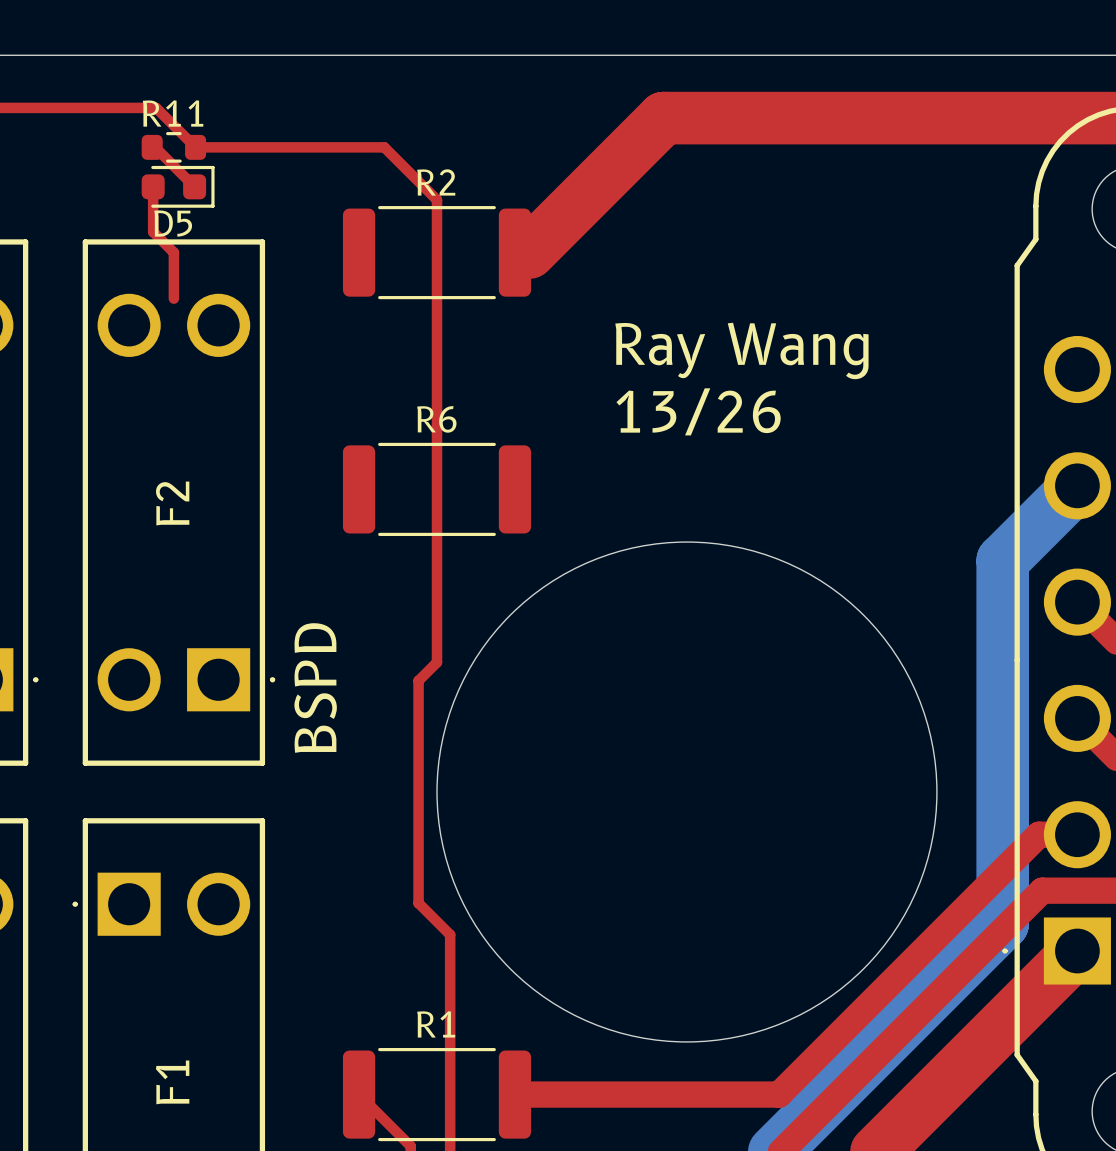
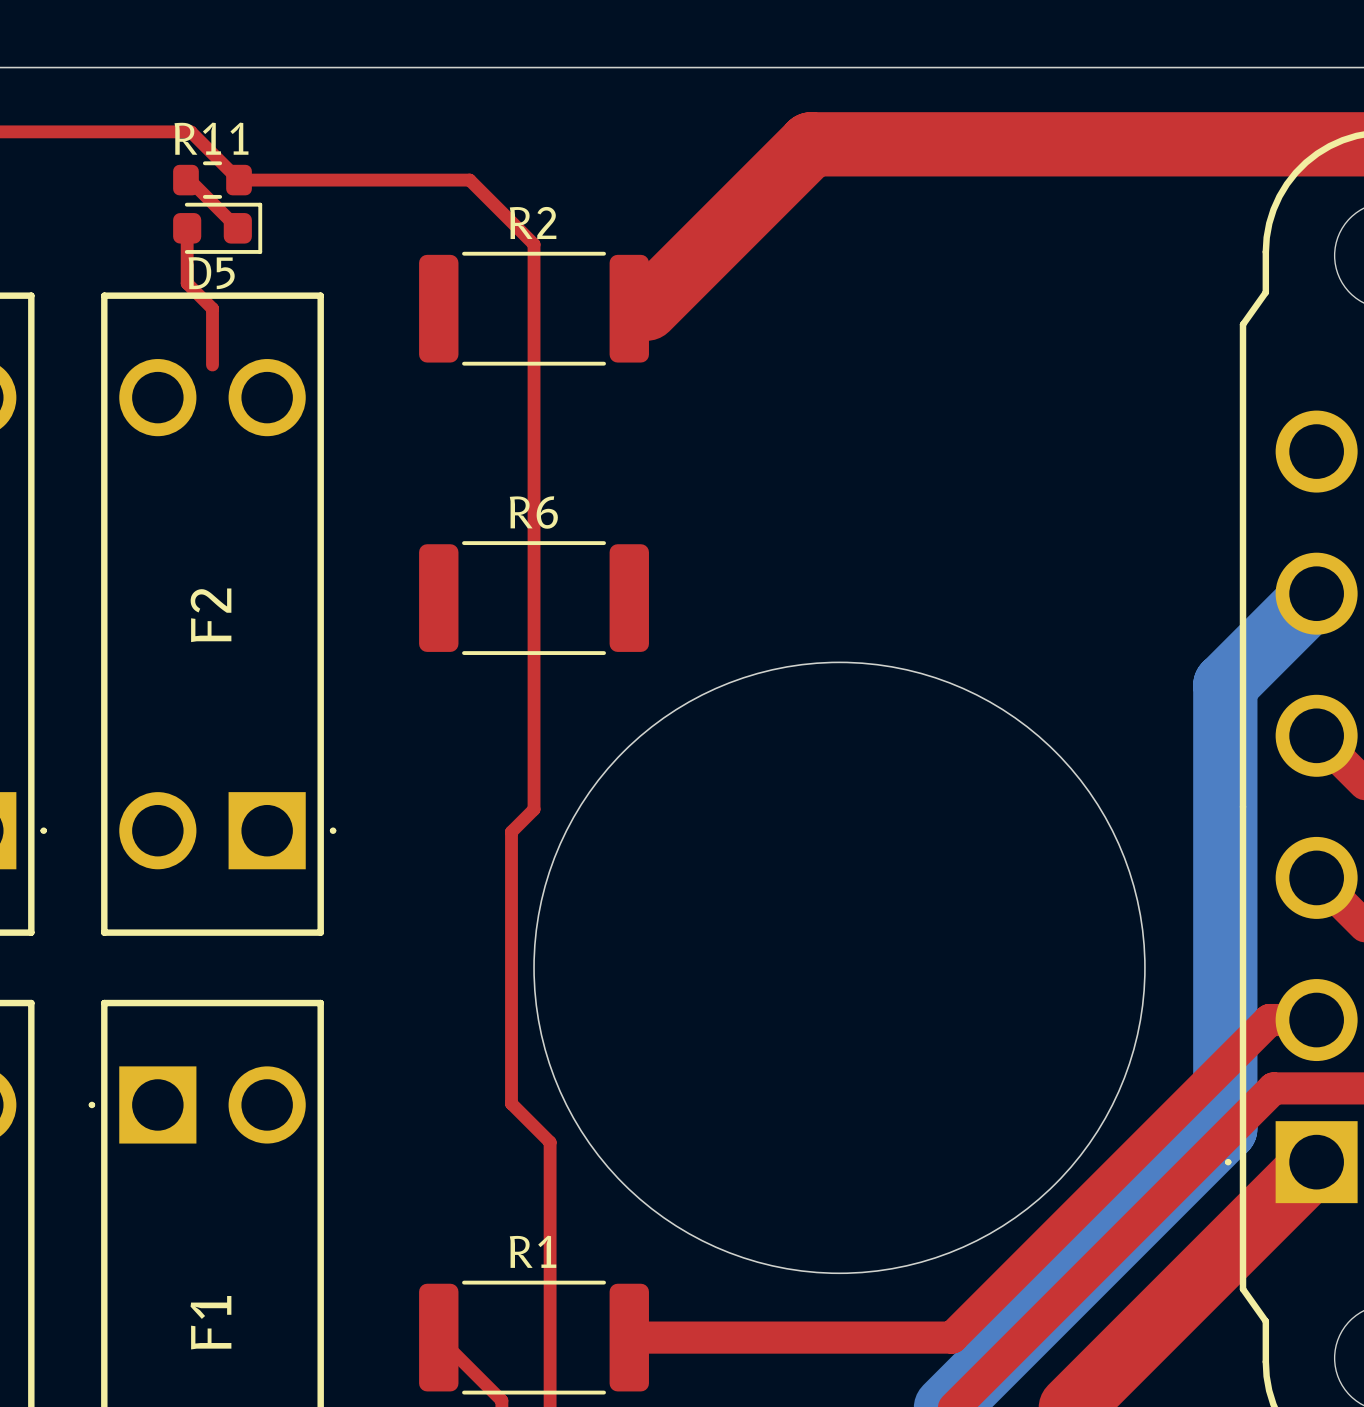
text: Ray Wang (741, 350) -> none
text: 13/26 (698, 411) -> none
text: BSPD (315, 688) -> none

